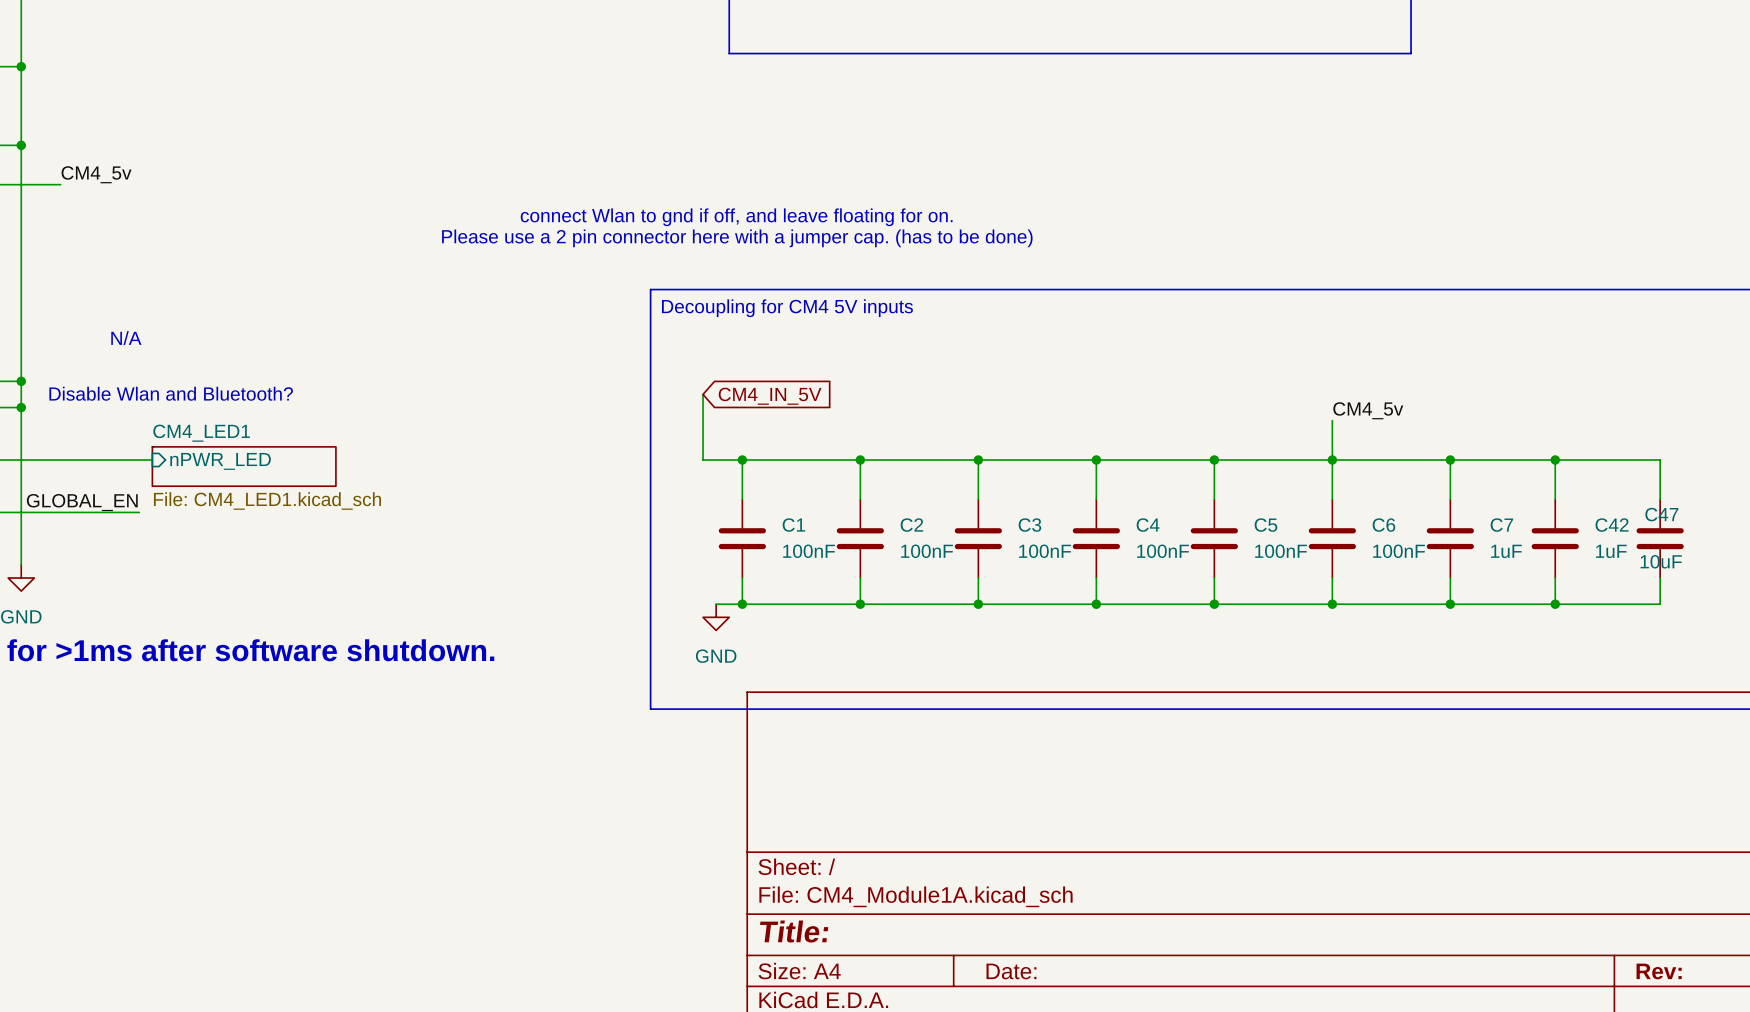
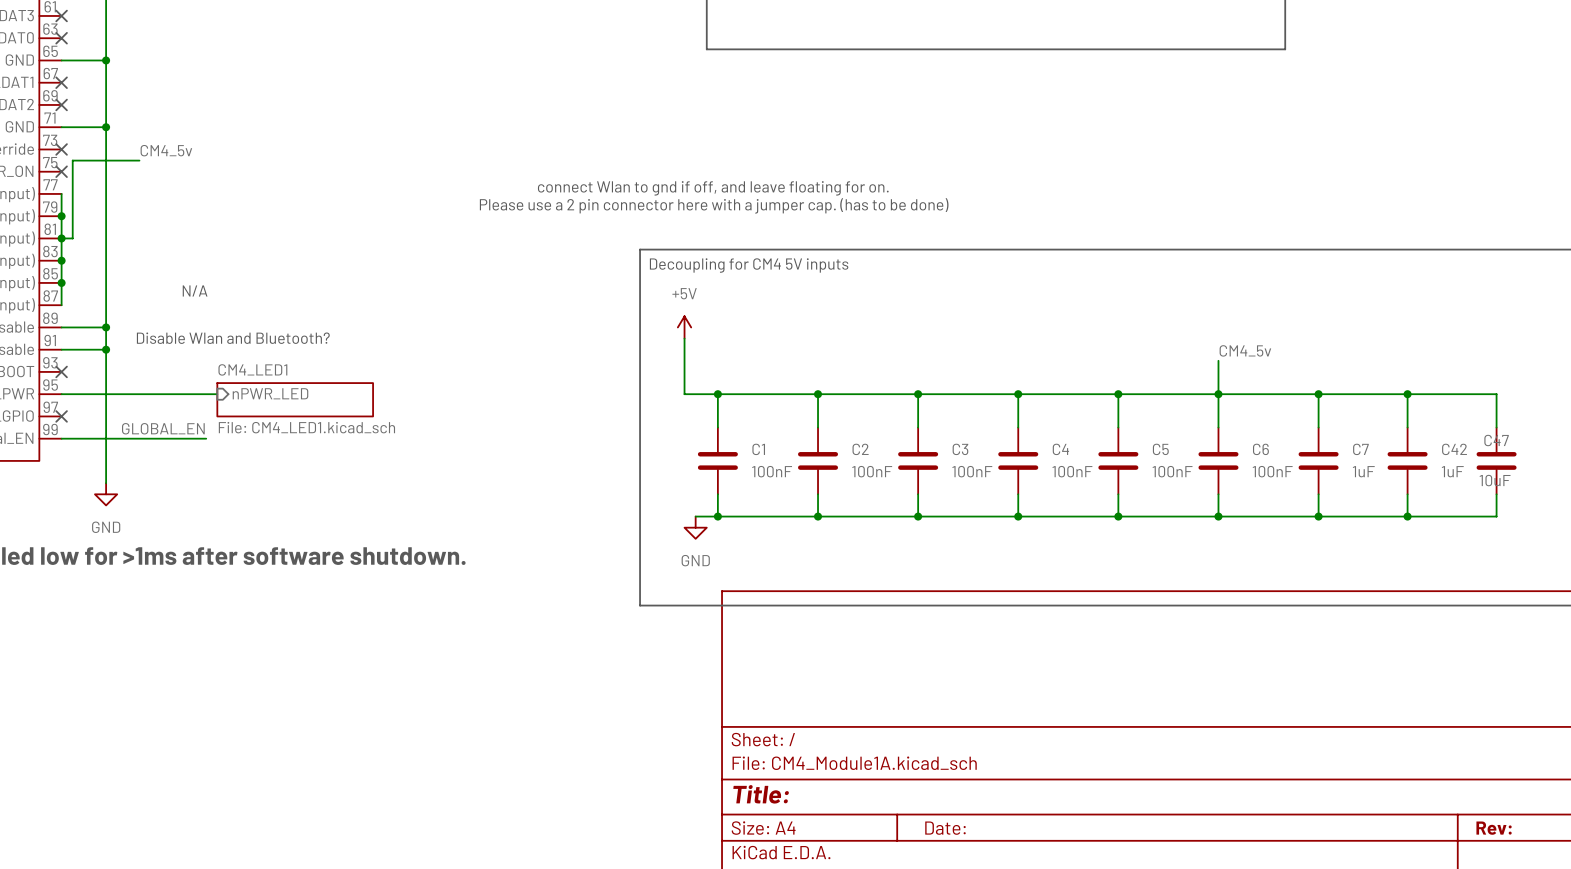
power symbol: none -> +5V (684, 327)
global label: CM4_IN_5V (770, 396) -> none

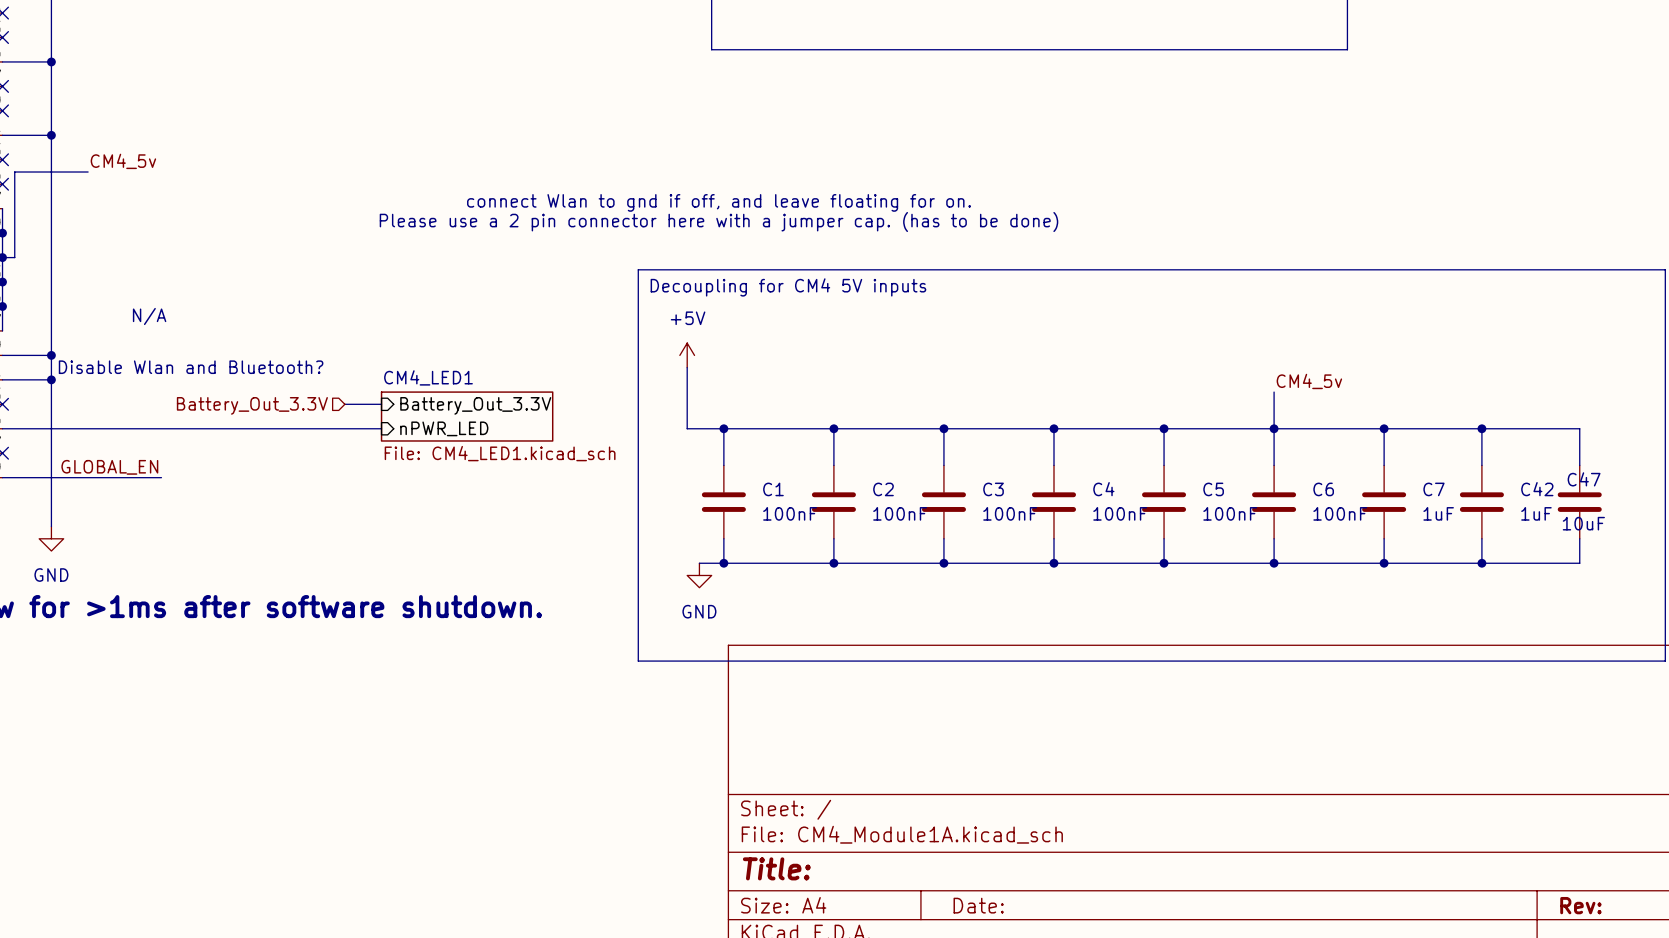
wire: none -> (344, 404) (381, 404)
hierarchical label: none -> Battery_Out_3.3V (252, 405)
sheet pin: none -> Battery_Out_3.3V (475, 405)
sheet CM4_LED1 shape: [216, 382, 374, 418] -> [380, 391, 554, 442]
sheet pin position: nPWR_LED (270, 393) -> nPWR_LED (444, 428)
wire: none -> (173, 428) (381, 428)

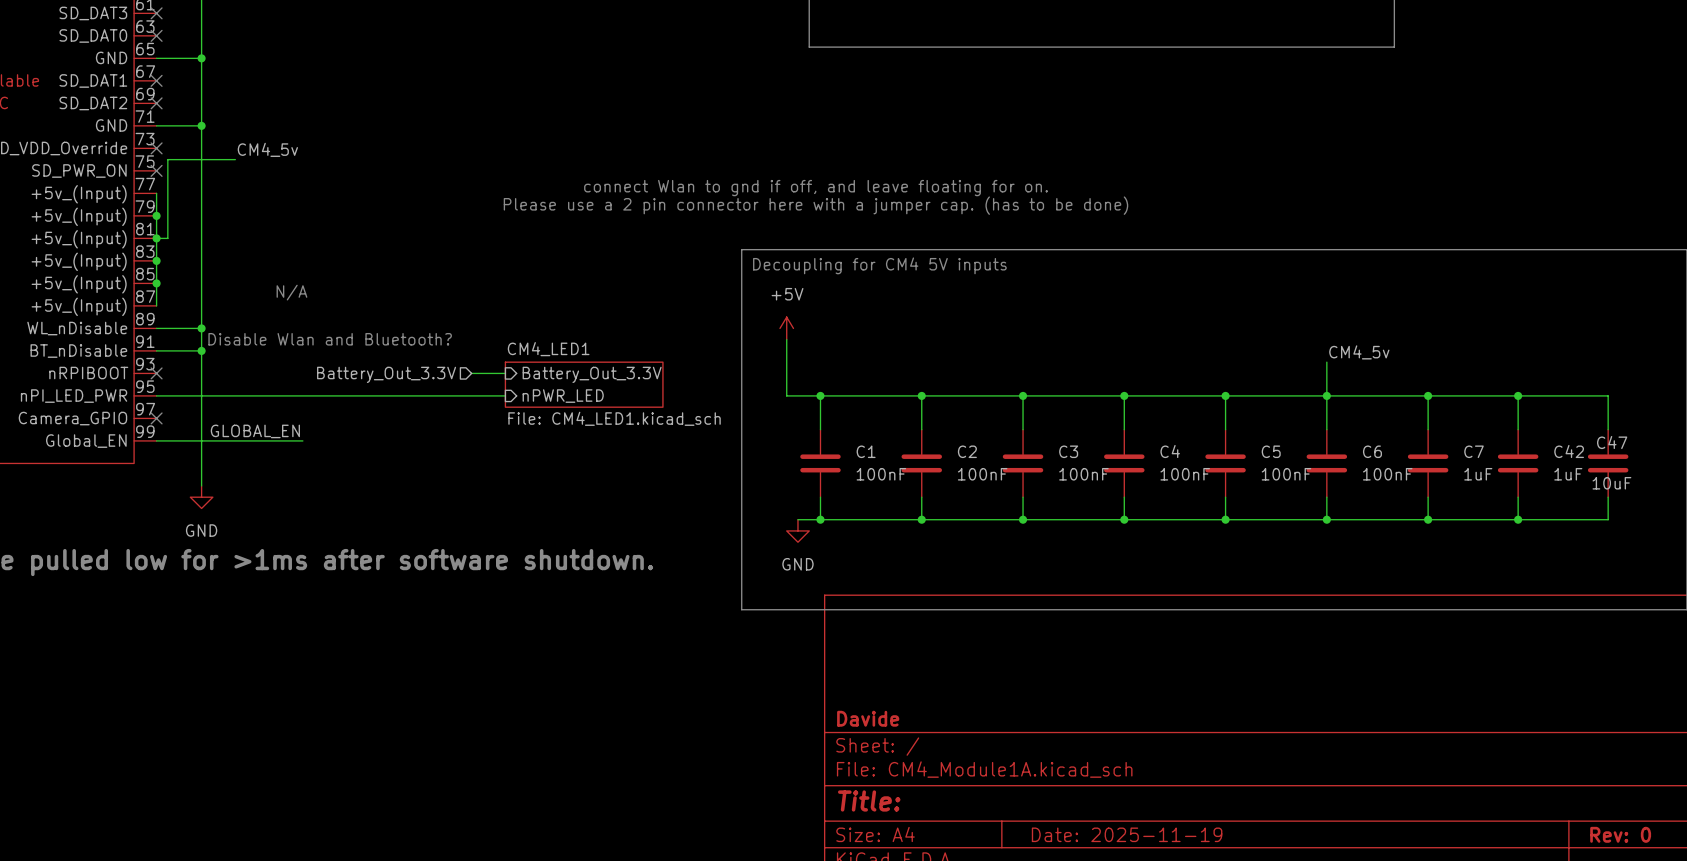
title block: none -> Davide (868, 718)
title block: Date: (978, 905) -> Date: 2025-11-19 (1127, 834)
title block: Rev: (1580, 905) -> Rev: 0 (1620, 834)

